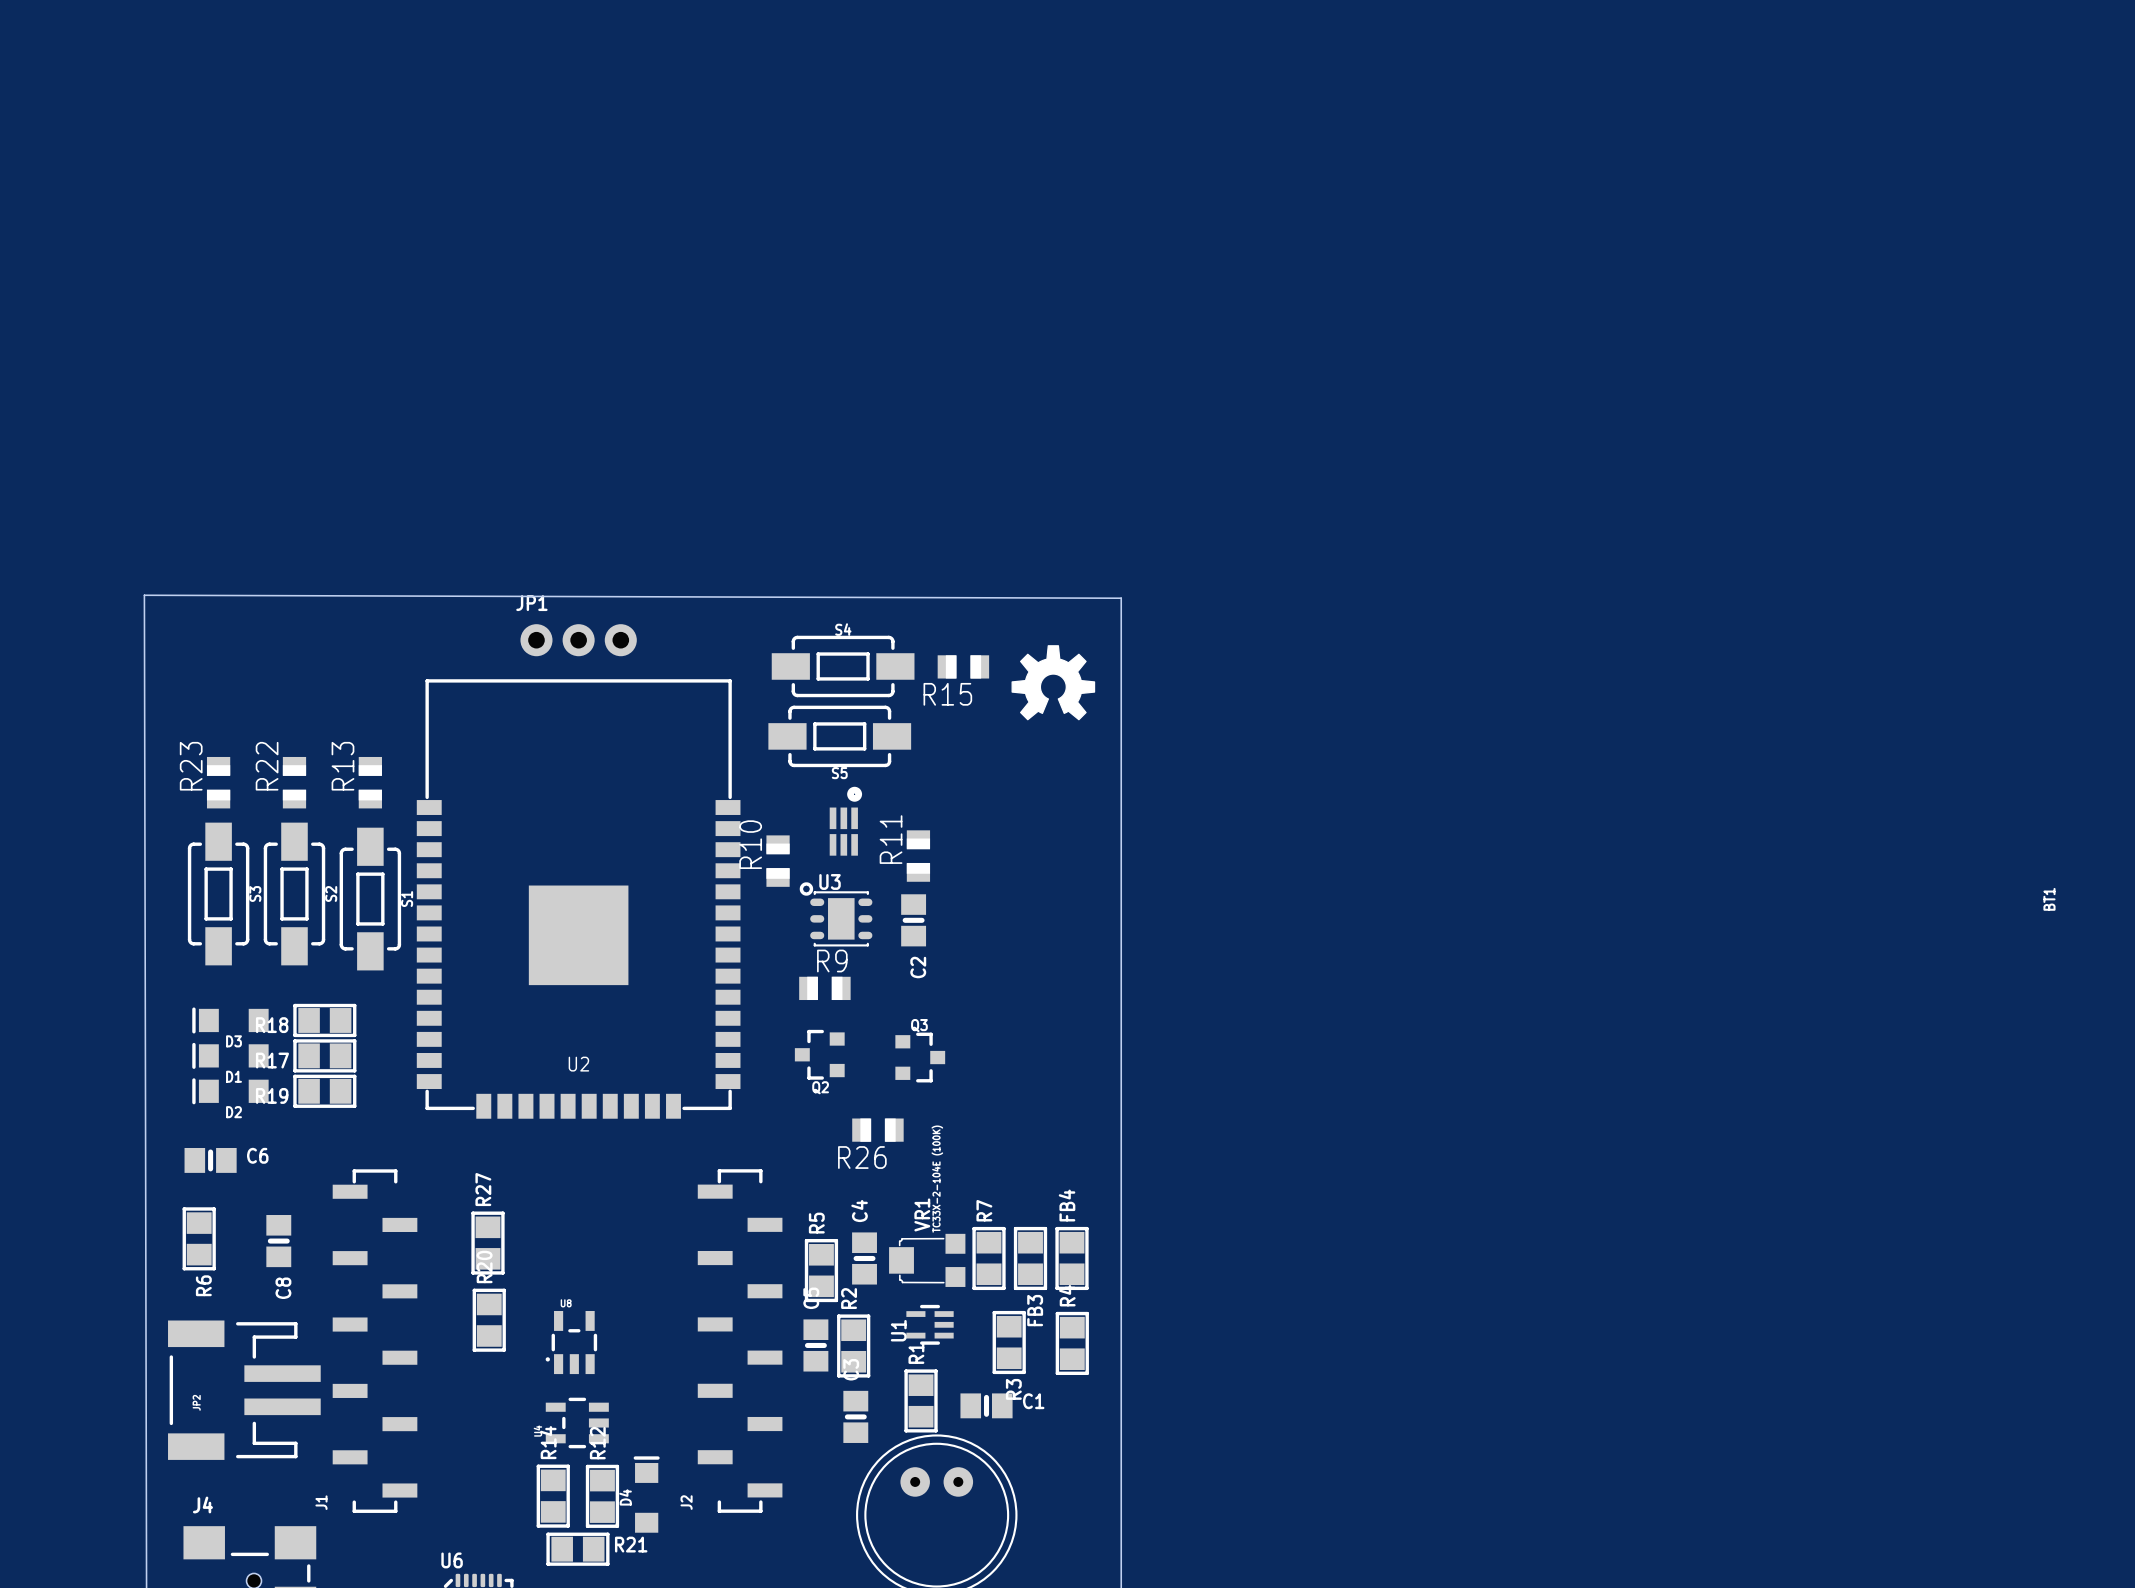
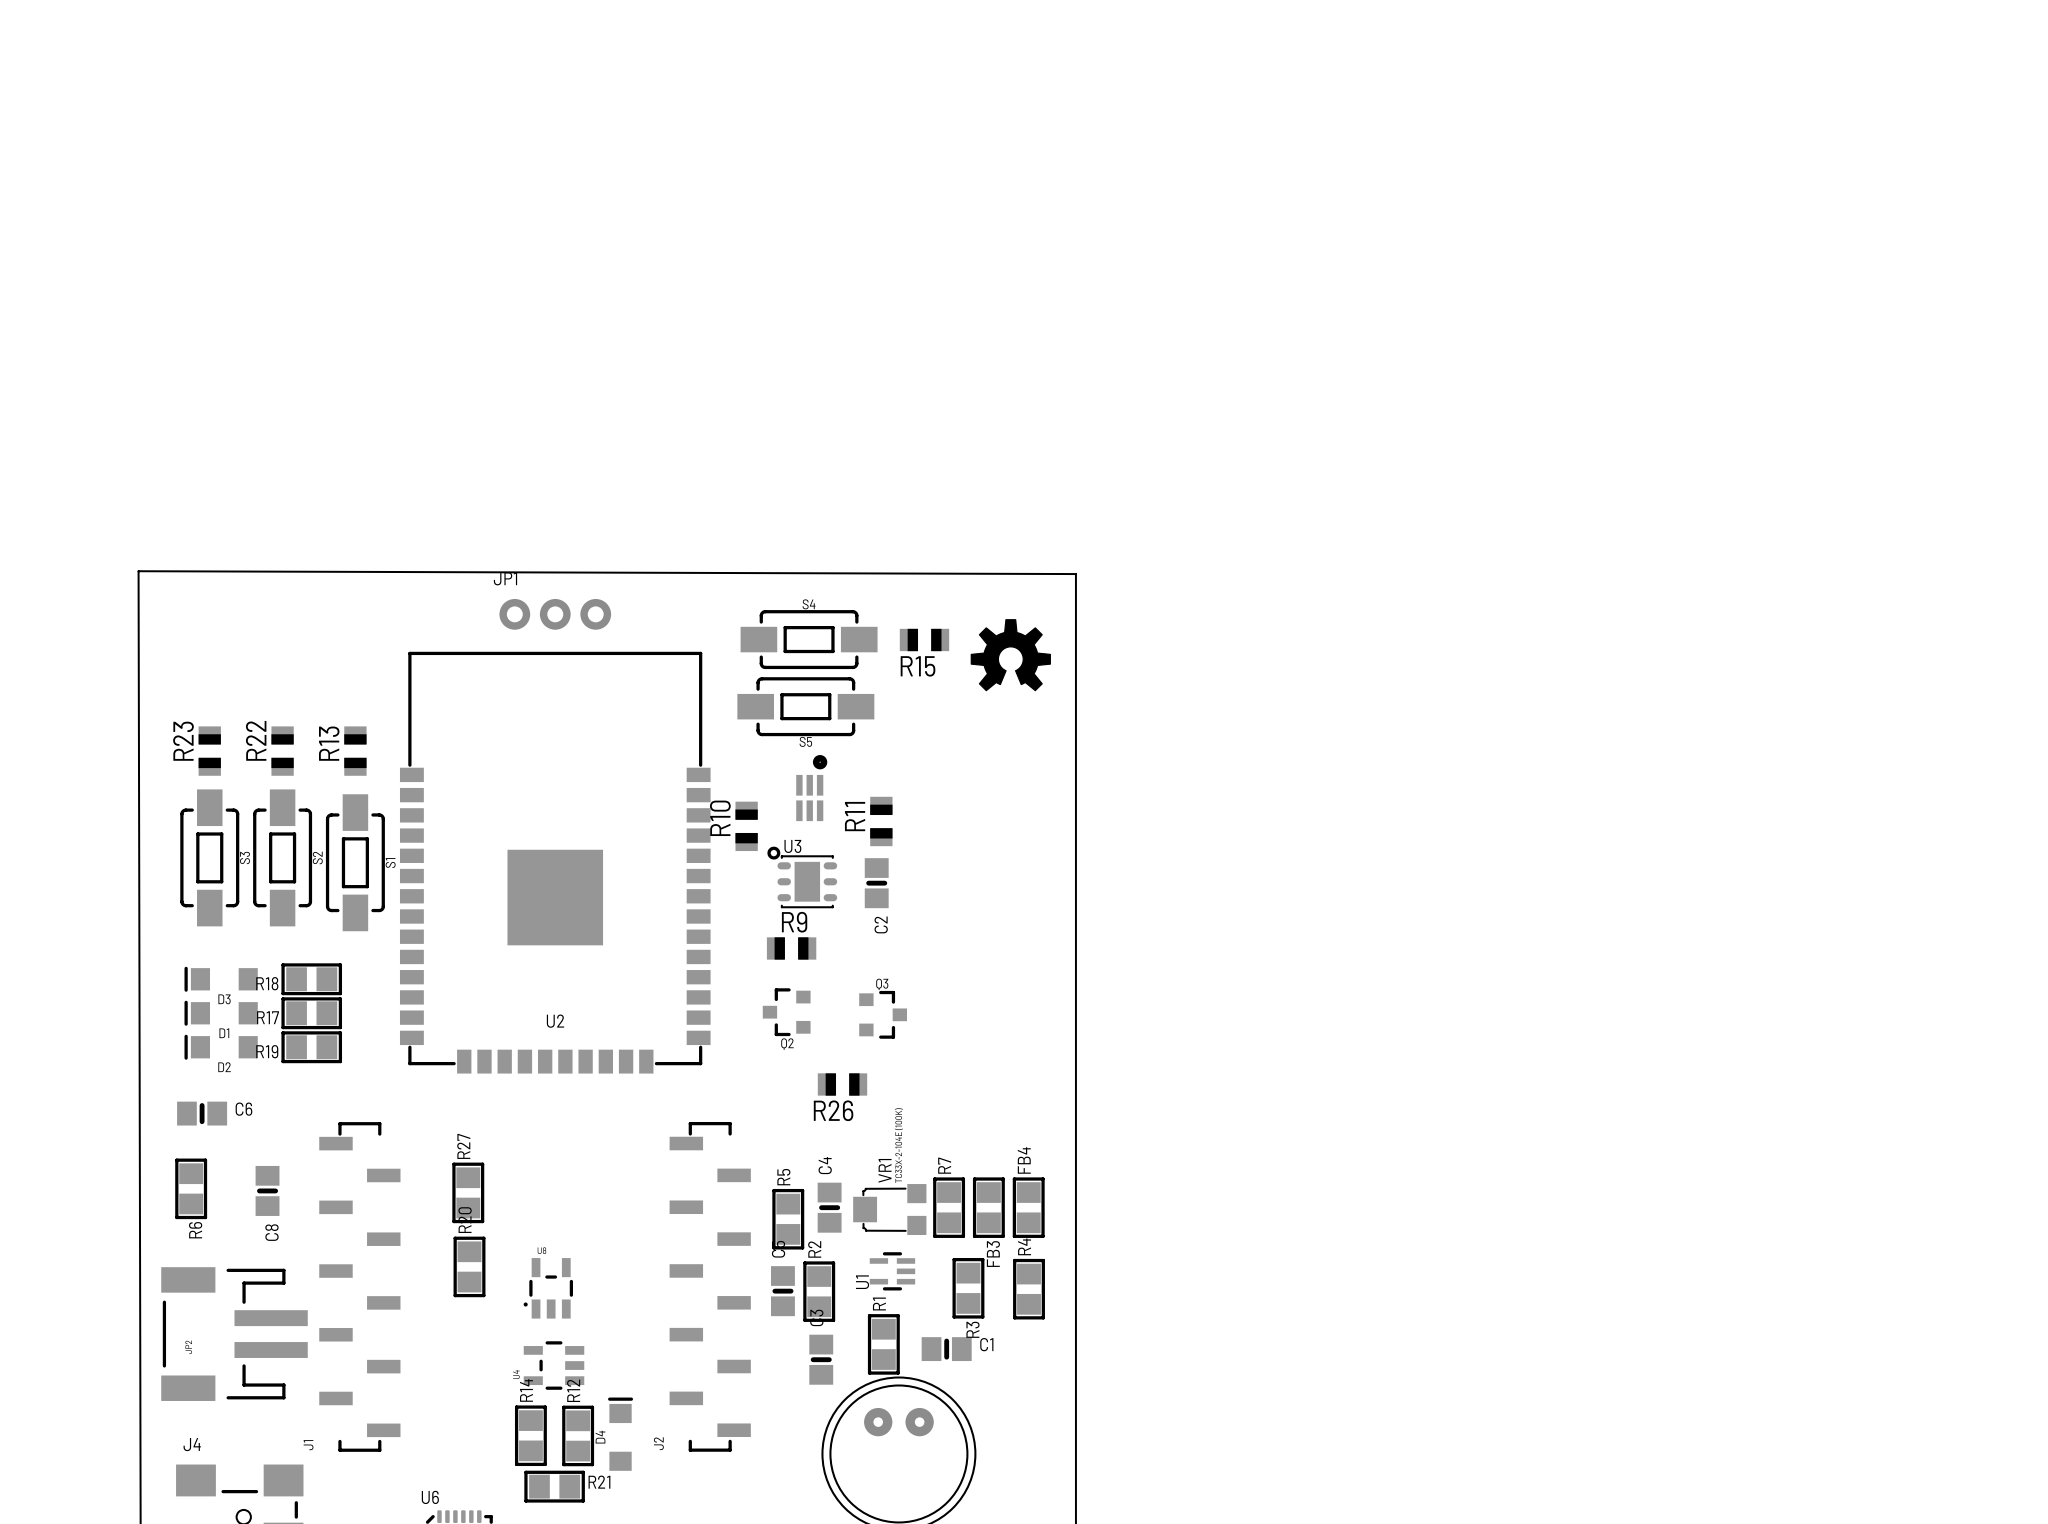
BT1: (2049, 899) -> none

